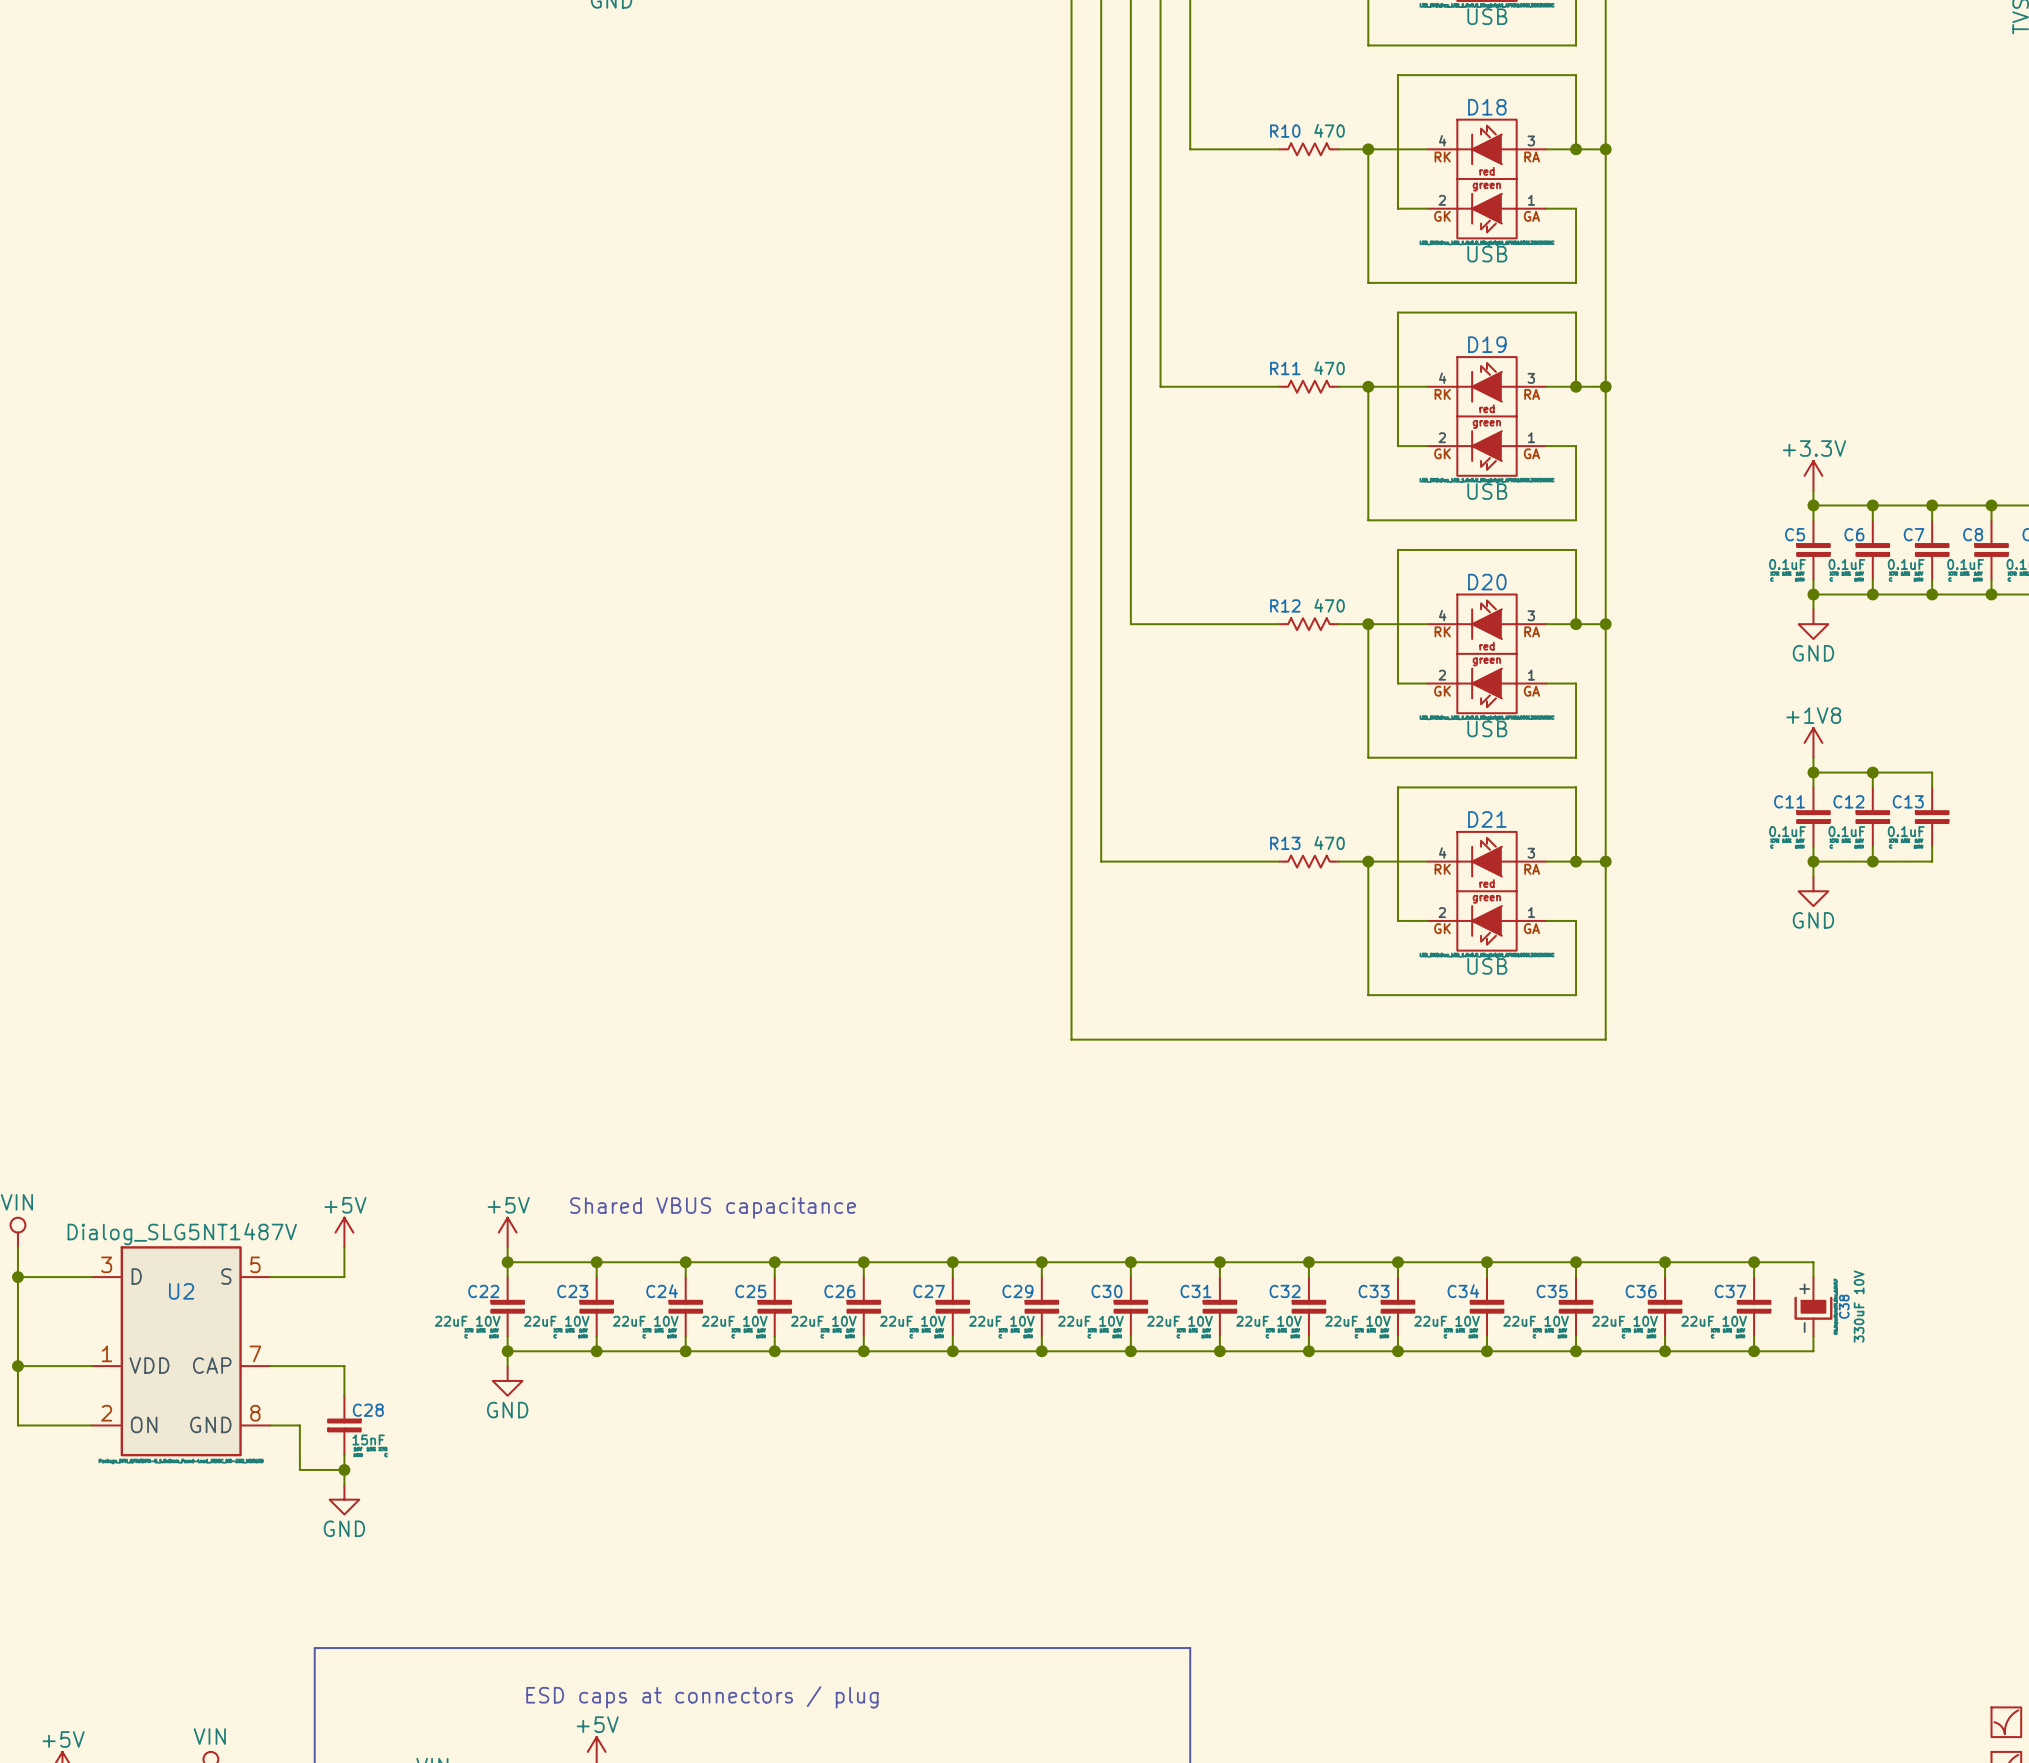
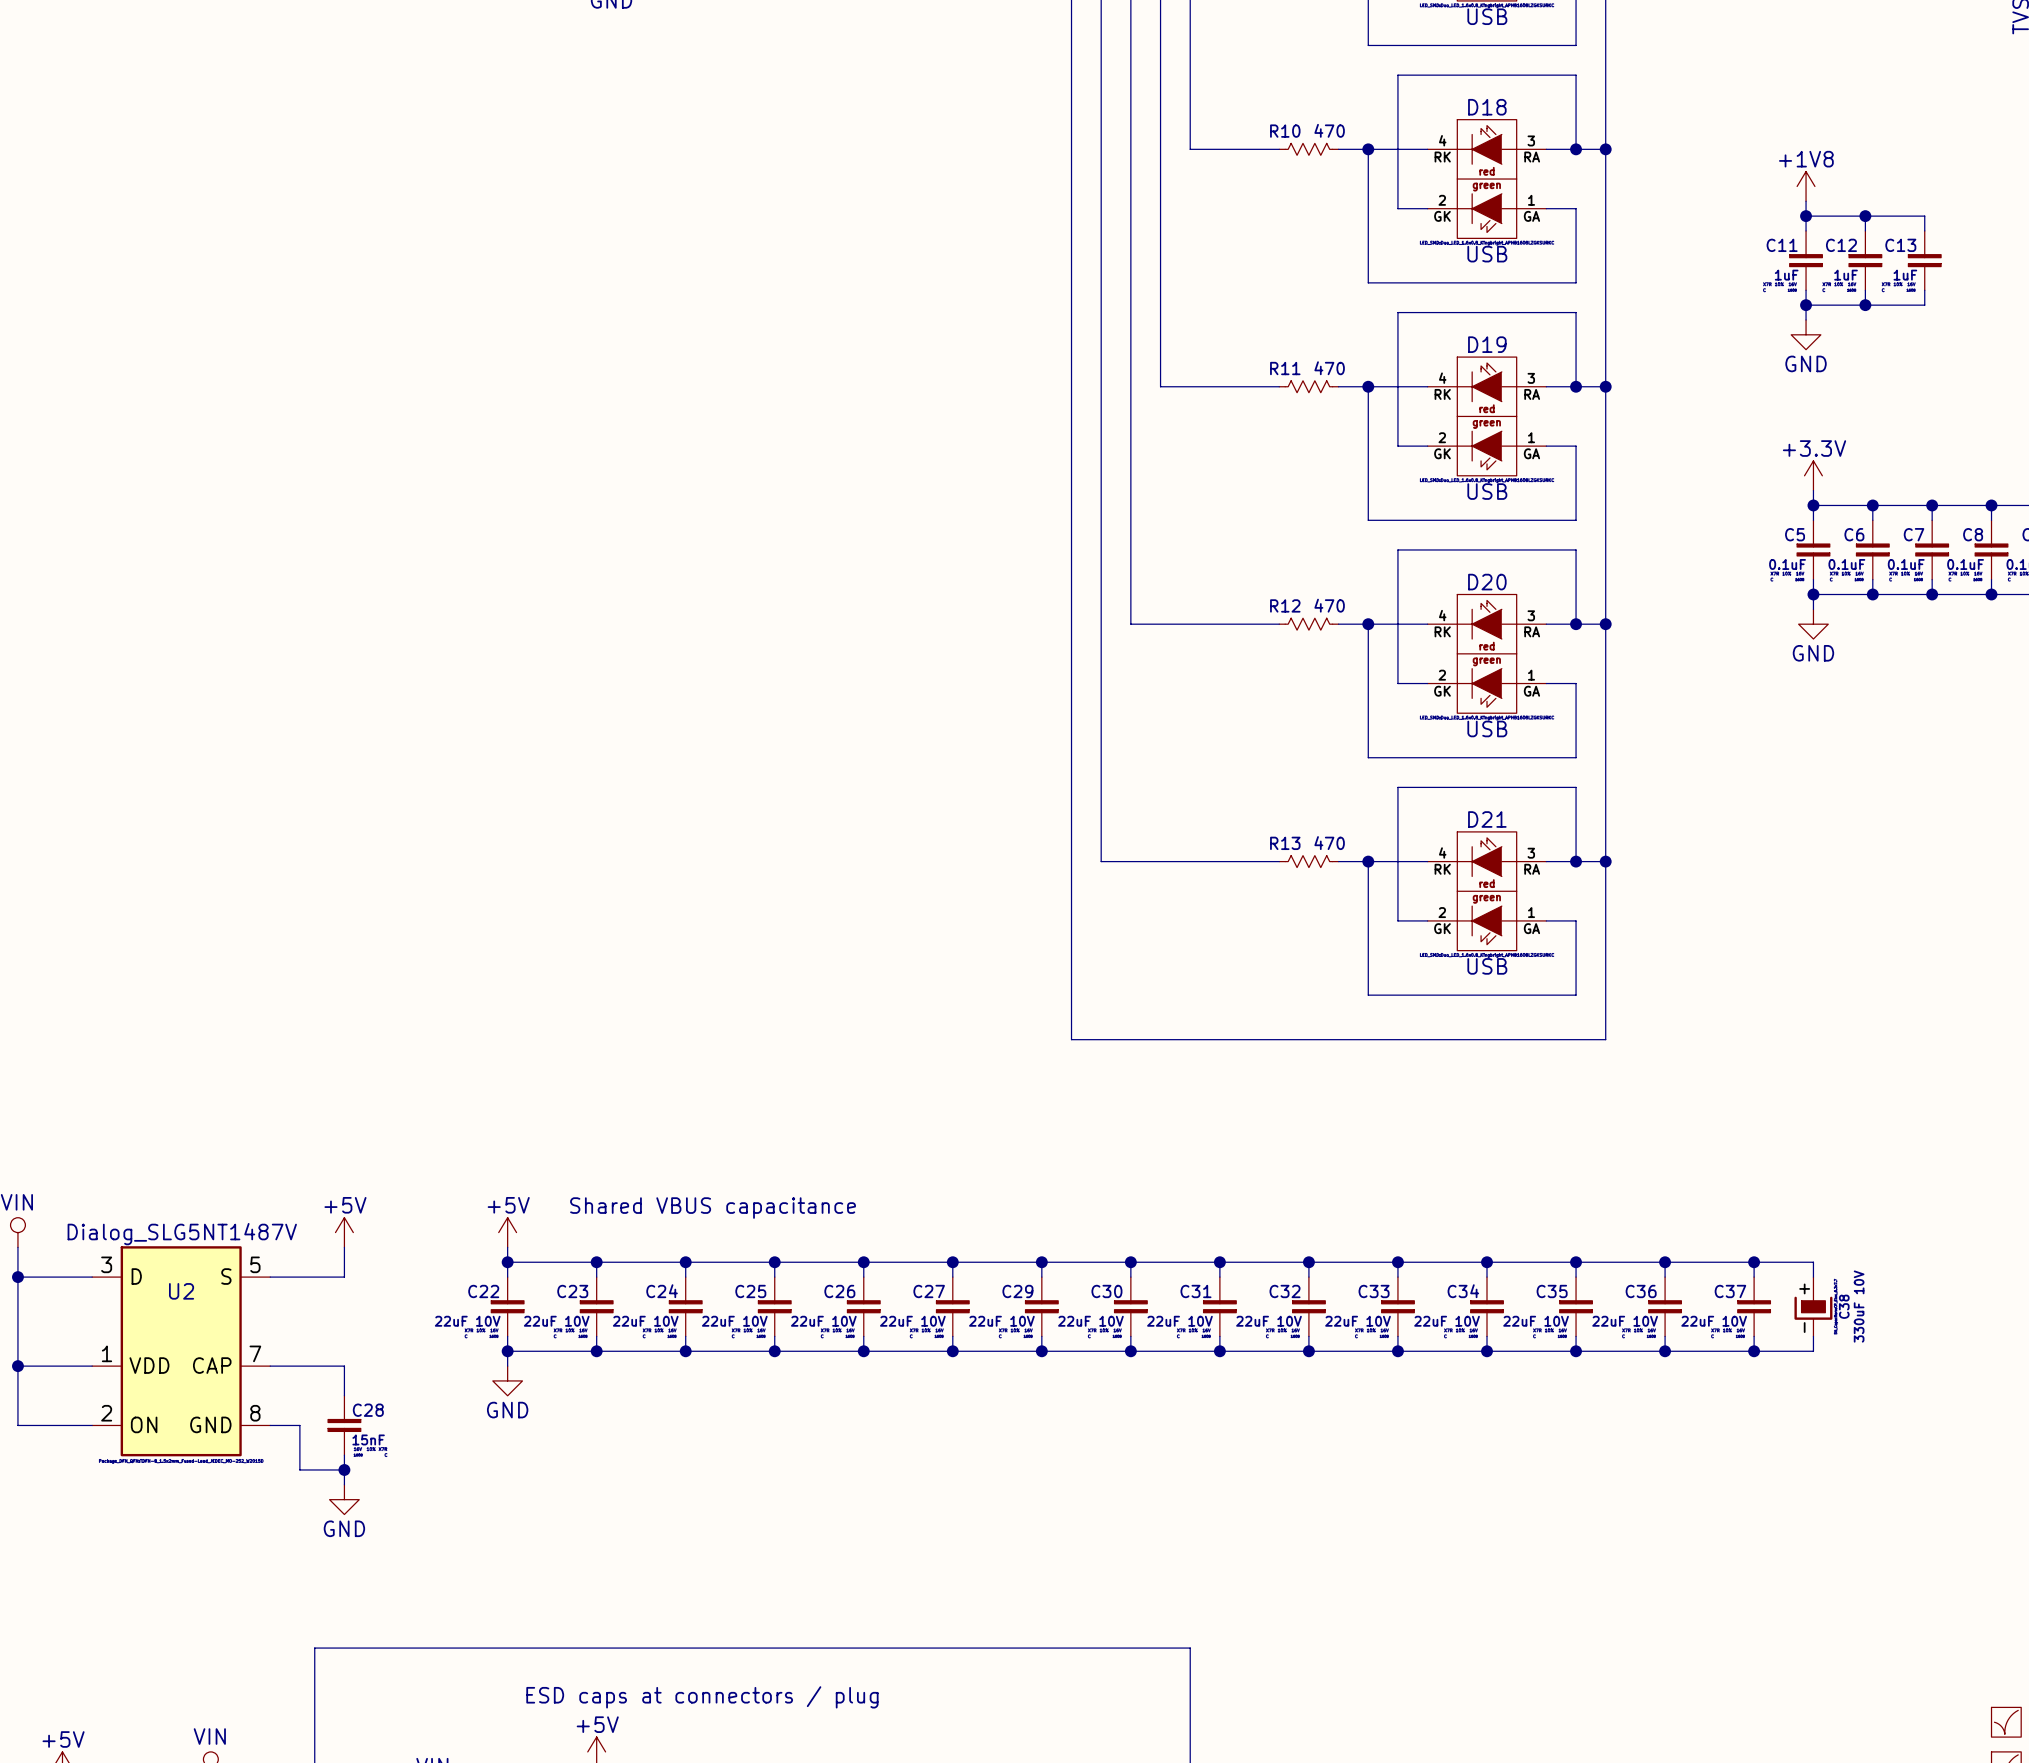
power symbol: none -> +1V8 (1806, 186)
wire: none -> (1806, 201) (1806, 230)
wire: none -> (1806, 216) (1924, 216) (1924, 230)
junction: none -> (1806, 216)
wire: none -> (1865, 216) (1865, 230)
junction: none -> (1865, 216)
wire: none -> (1806, 290) (1806, 319)
wire: none -> (1865, 290) (1865, 305)
wire: none -> (1924, 290) (1924, 305) (1806, 305)
junction: none -> (1806, 305)
junction: none -> (1865, 305)
power symbol: none -> GND (1806, 334)
power symbol: +1V8 (1813, 742) -> none
wire: (1813, 757) (1813, 787) -> none
wire: (1813, 772) (1932, 772) (1932, 787) -> none
junction: (1813, 772) -> none
wire: (1872, 772) (1872, 787) -> none
junction: (1872, 772) -> none
C11 position: (1813, 817) -> (1806, 260)
C12 position: (1872, 817) -> (1865, 260)
C13 position: (1932, 817) -> (1924, 260)
C11 value: 0.1uF (1787, 831) -> 1uF (1786, 275)
C12 value: 0.1uF (1846, 831) -> 1uF (1846, 275)
C13 value: 0.1uF (1906, 831) -> 1uF (1905, 275)
wire: (1813, 846) (1813, 876) -> none
wire: (1872, 846) (1872, 861) -> none
wire: (1932, 846) (1932, 861) (1813, 861) -> none
junction: (1813, 861) -> none
junction: (1872, 861) -> none
power symbol: GND (1813, 891) -> none

